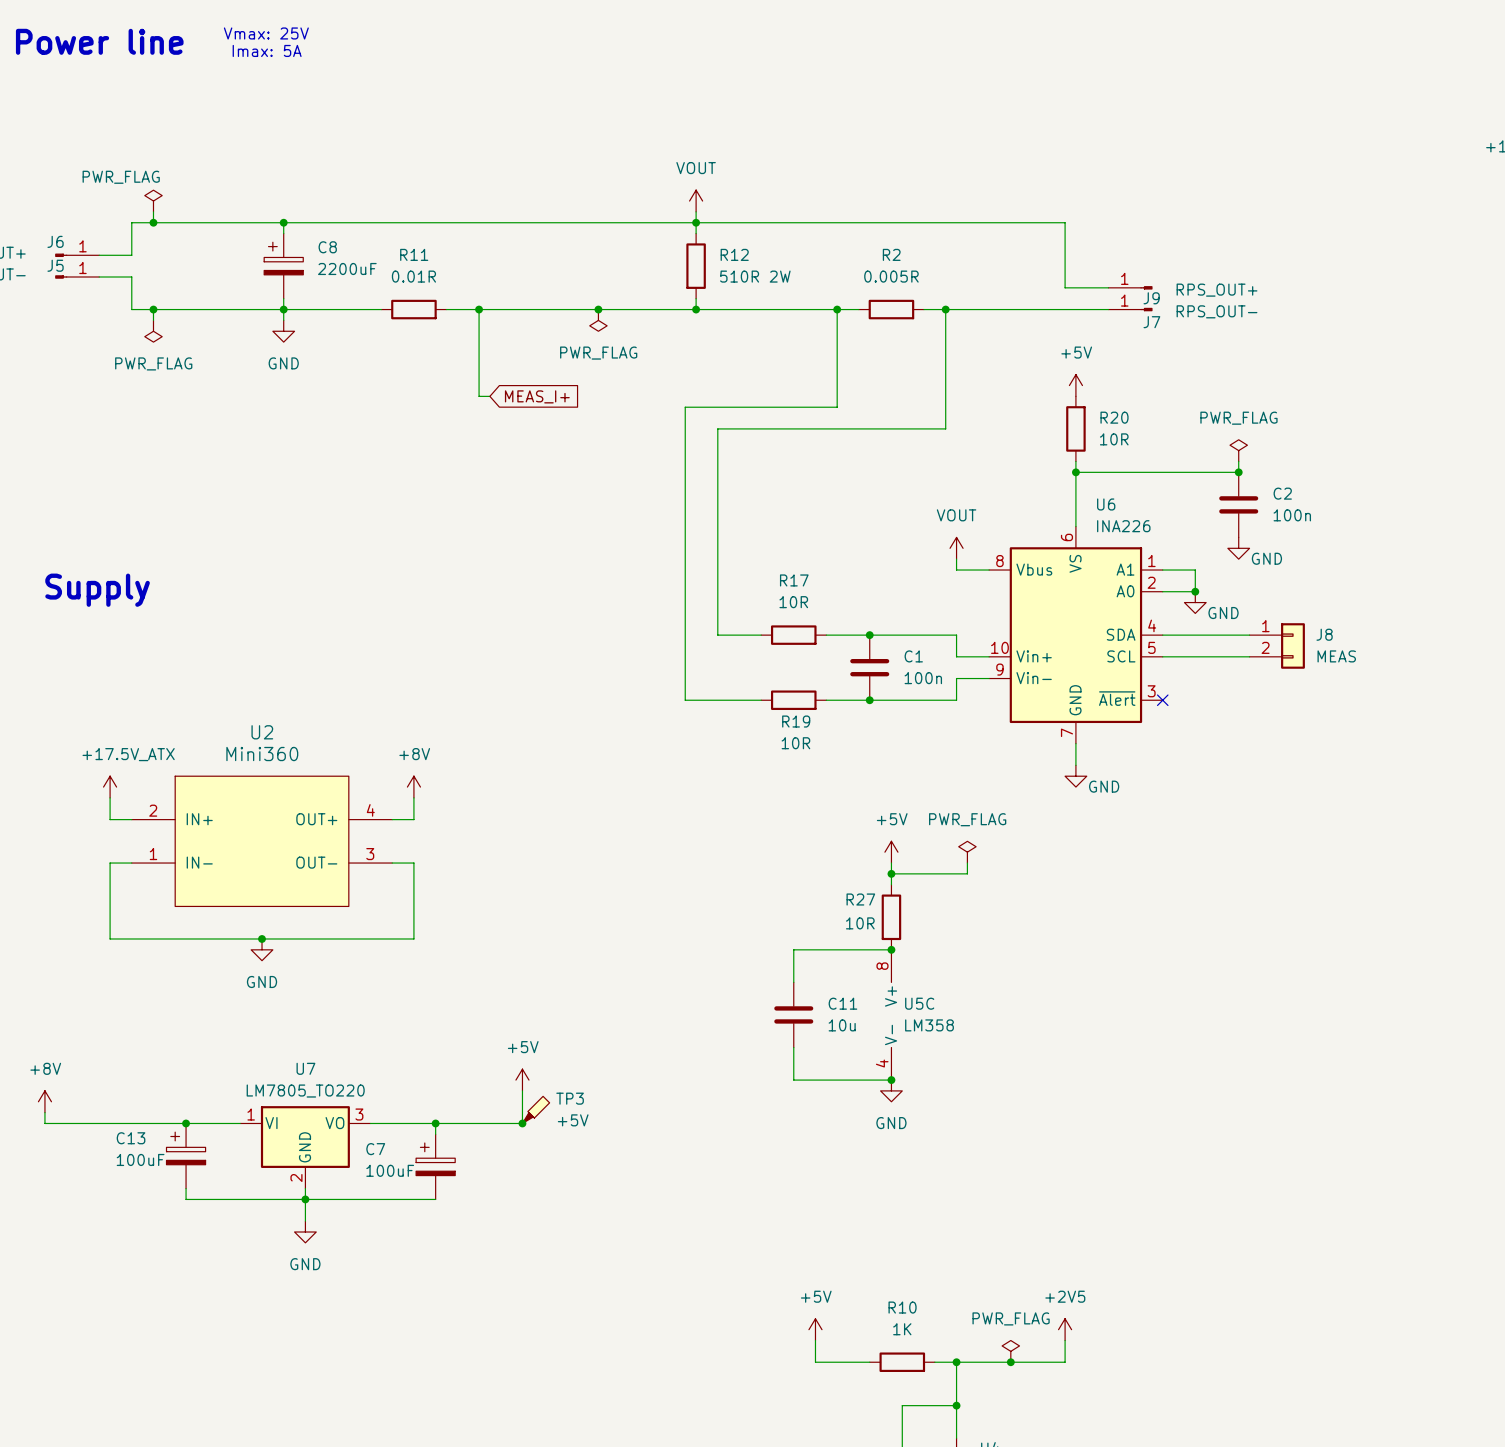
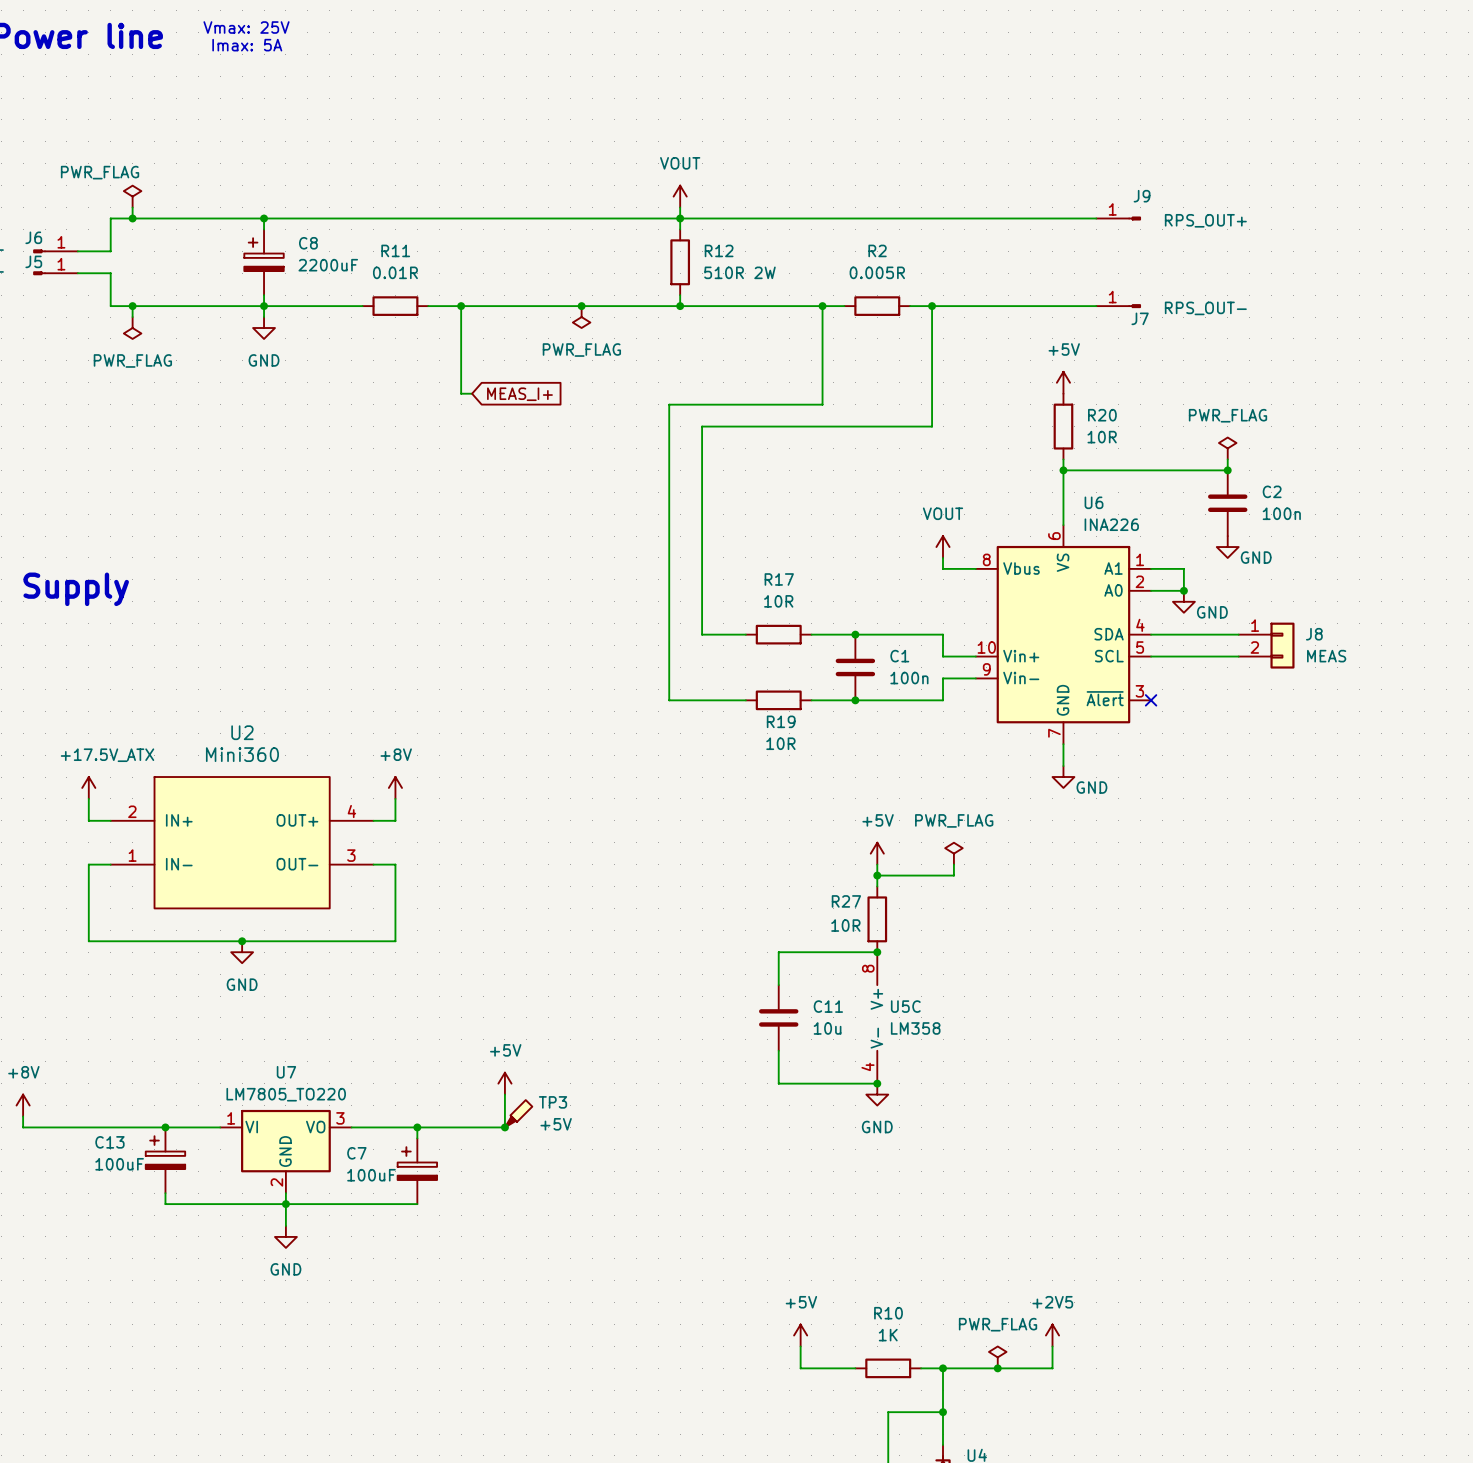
wire: (1065, 222) (1065, 287) (1108, 287) -> (1052, 218) (1096, 218)
J9 position: (1130, 287) -> (1118, 218)
J9 name position: J9 (1151, 298) -> J9 (1142, 196)

